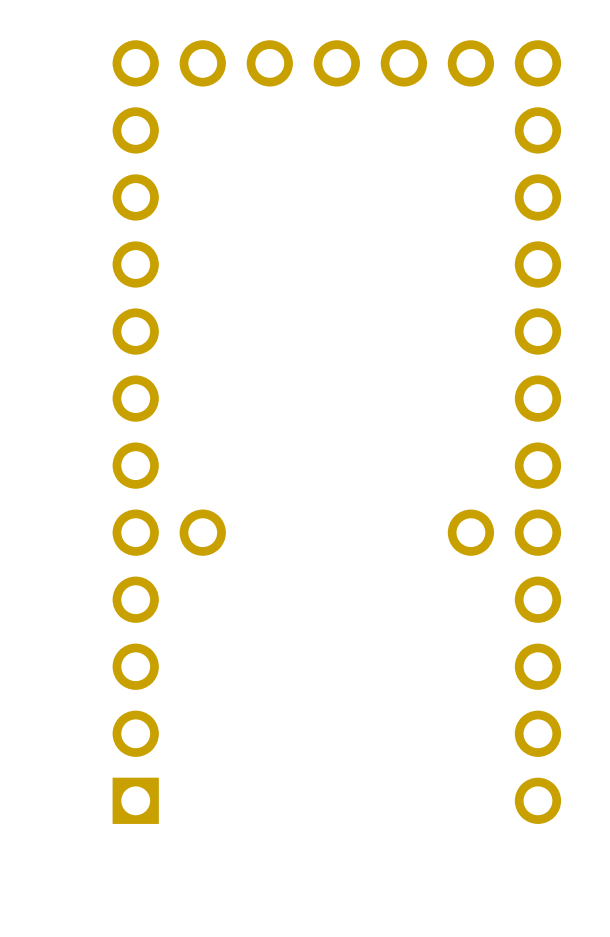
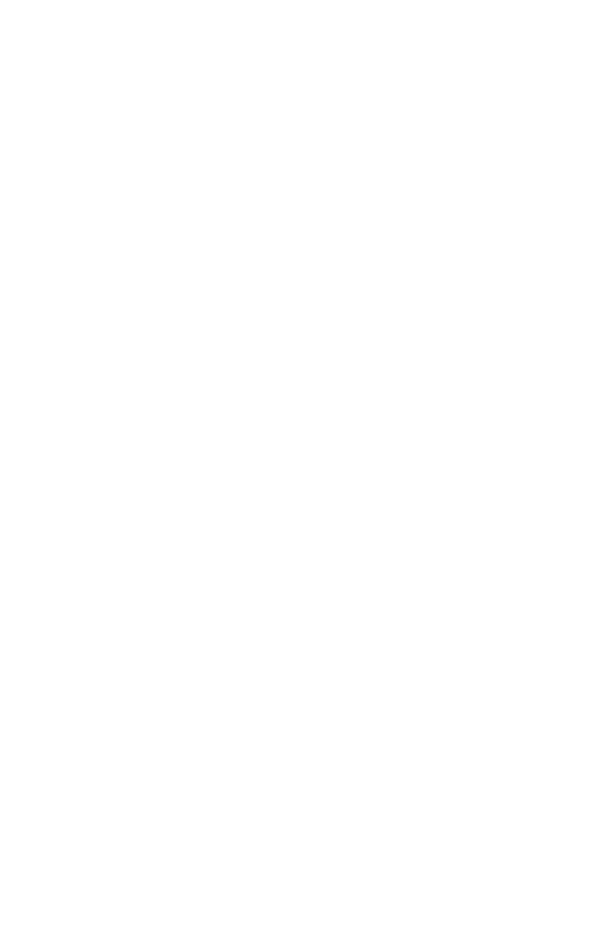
part: (336, 432) -> none

